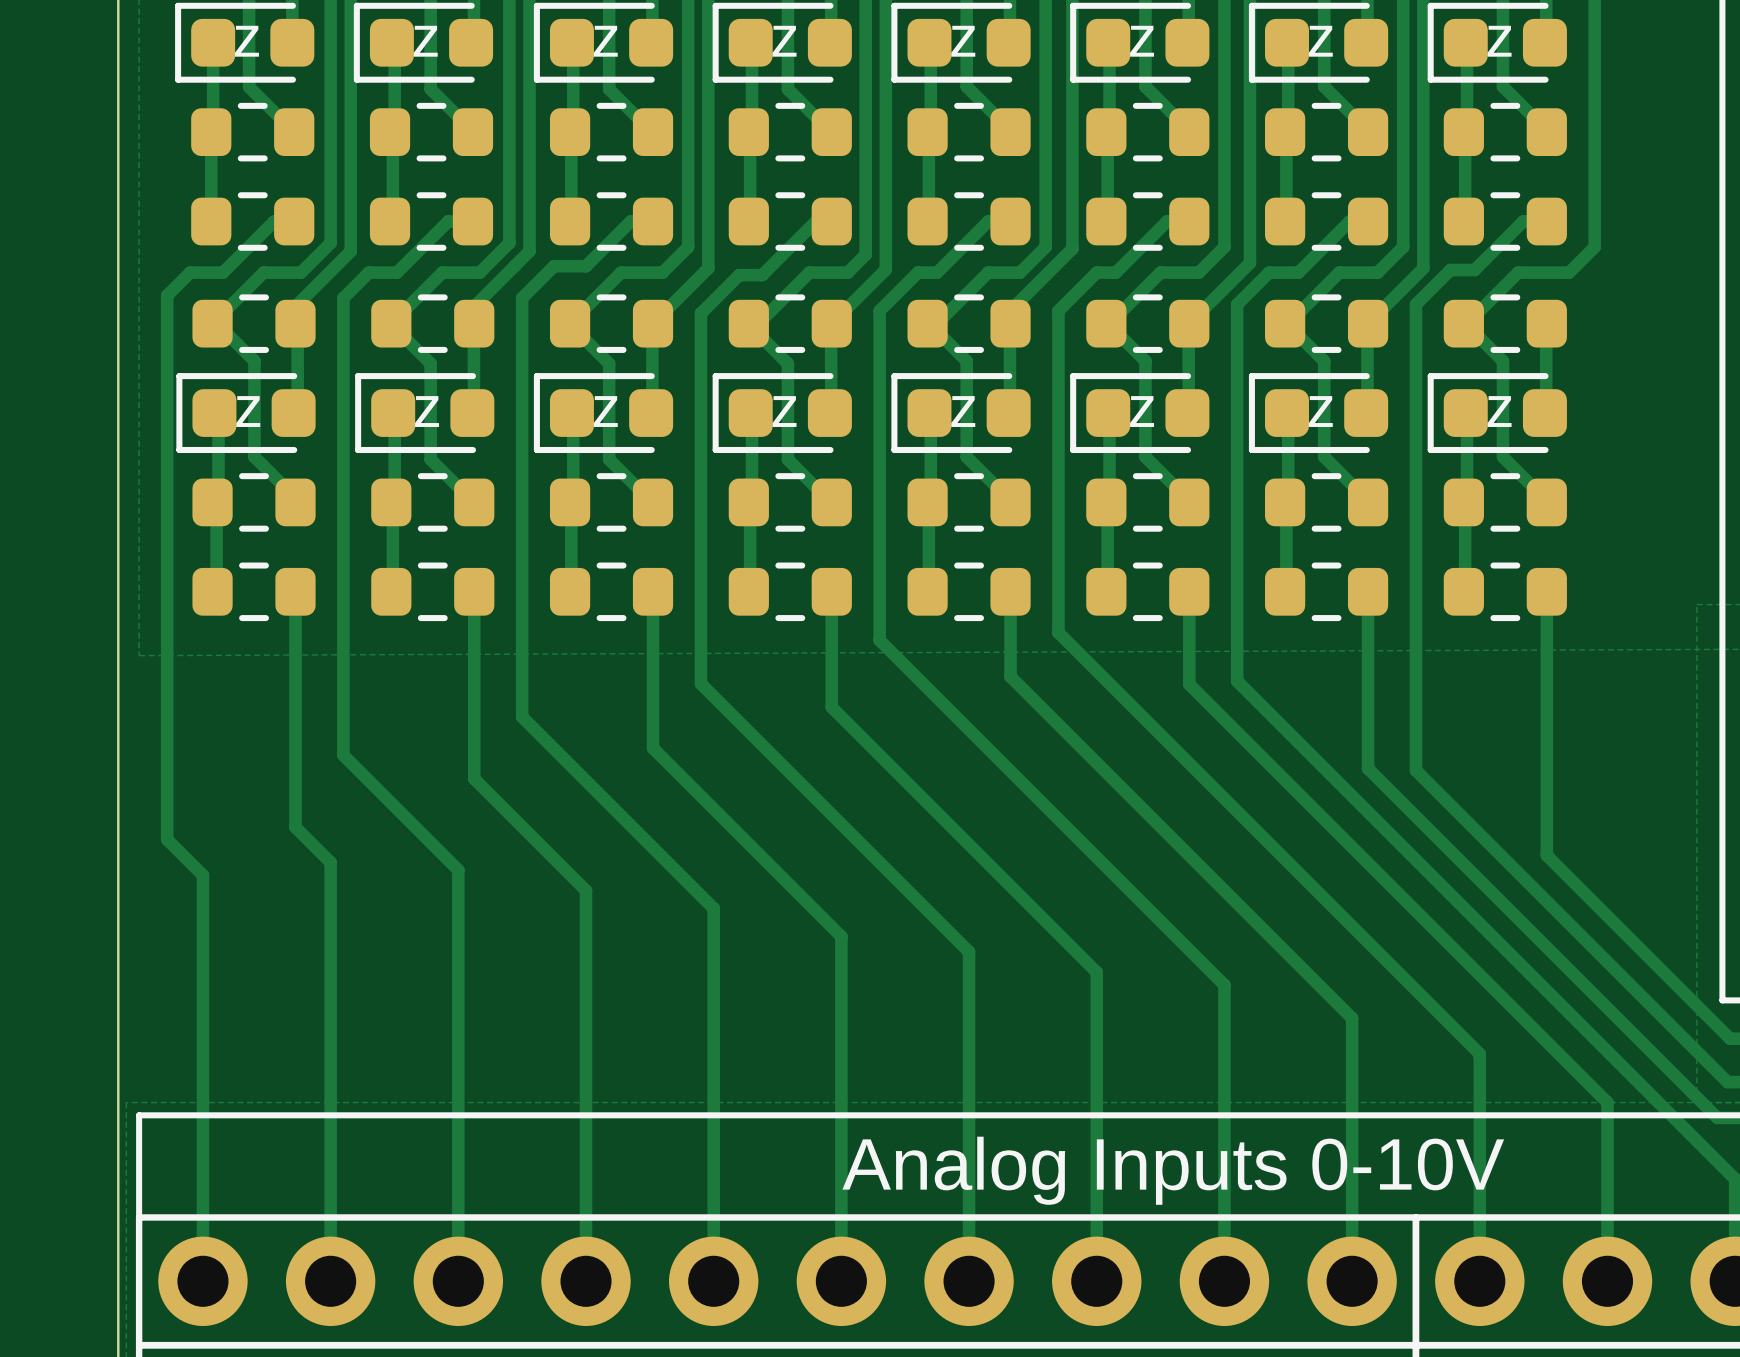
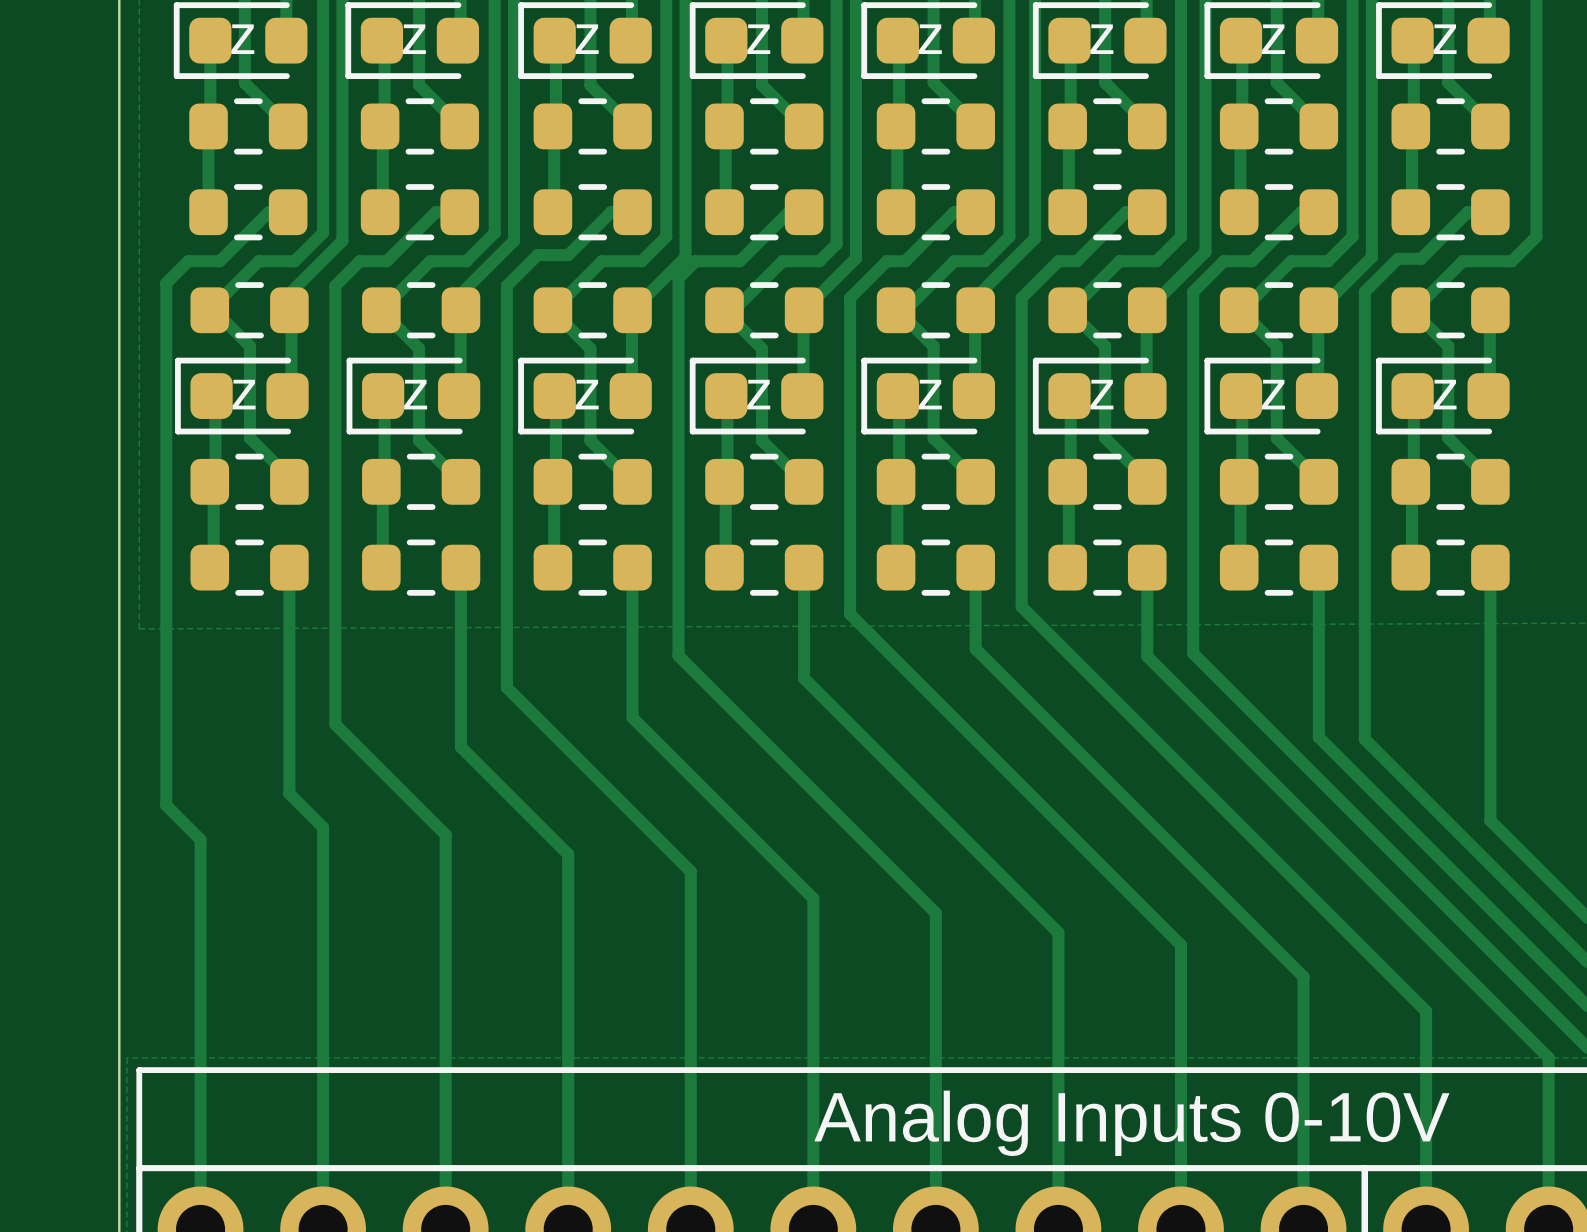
track: (764, 272) (762, 275) (739, 275) (700, 313) -> (739, 261) (695, 261) (678, 278) (678, 300)

